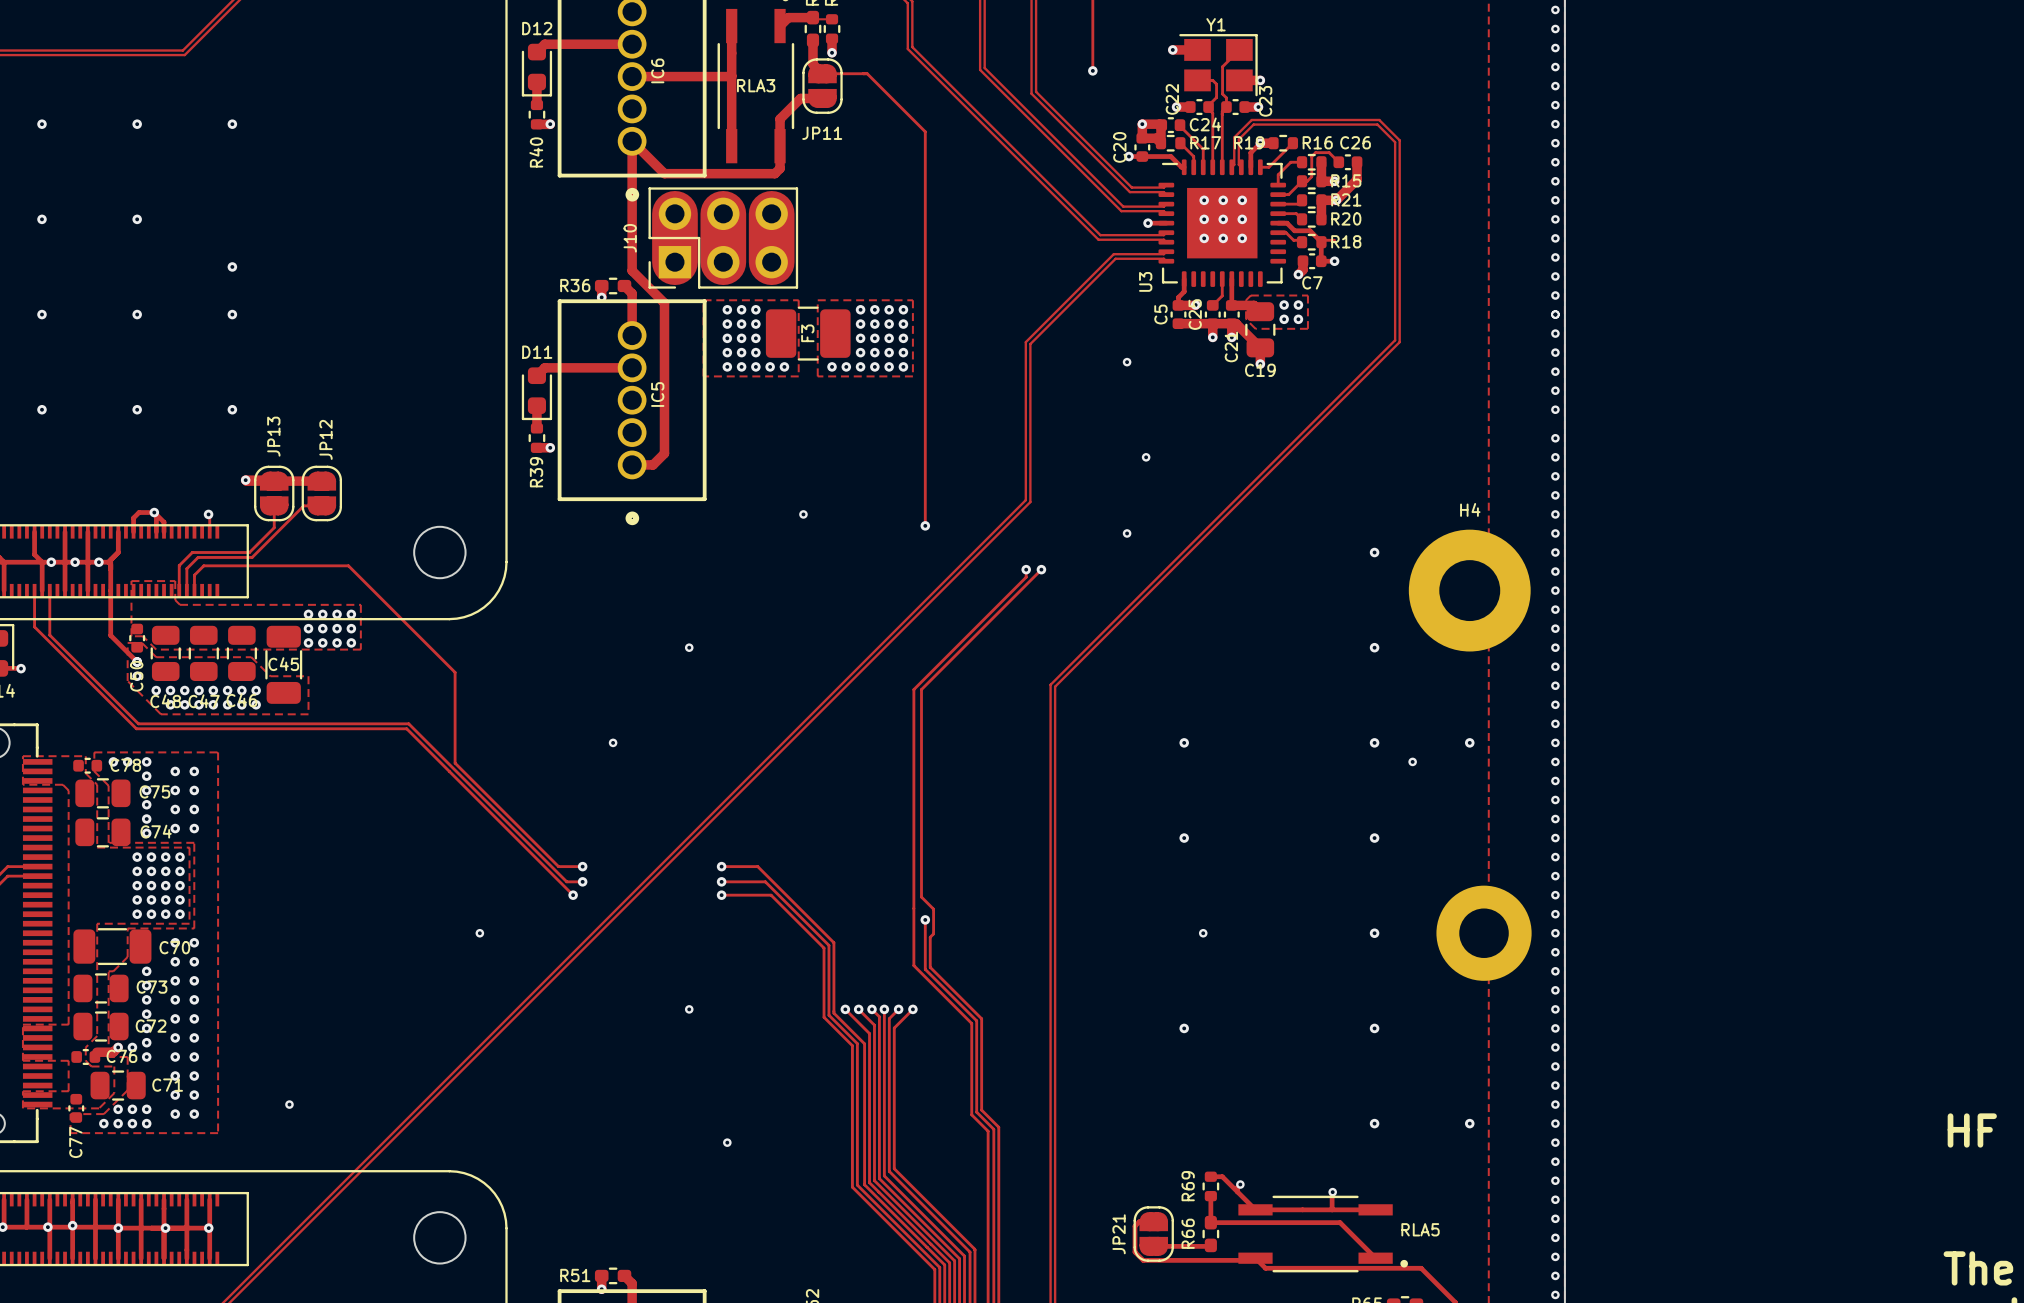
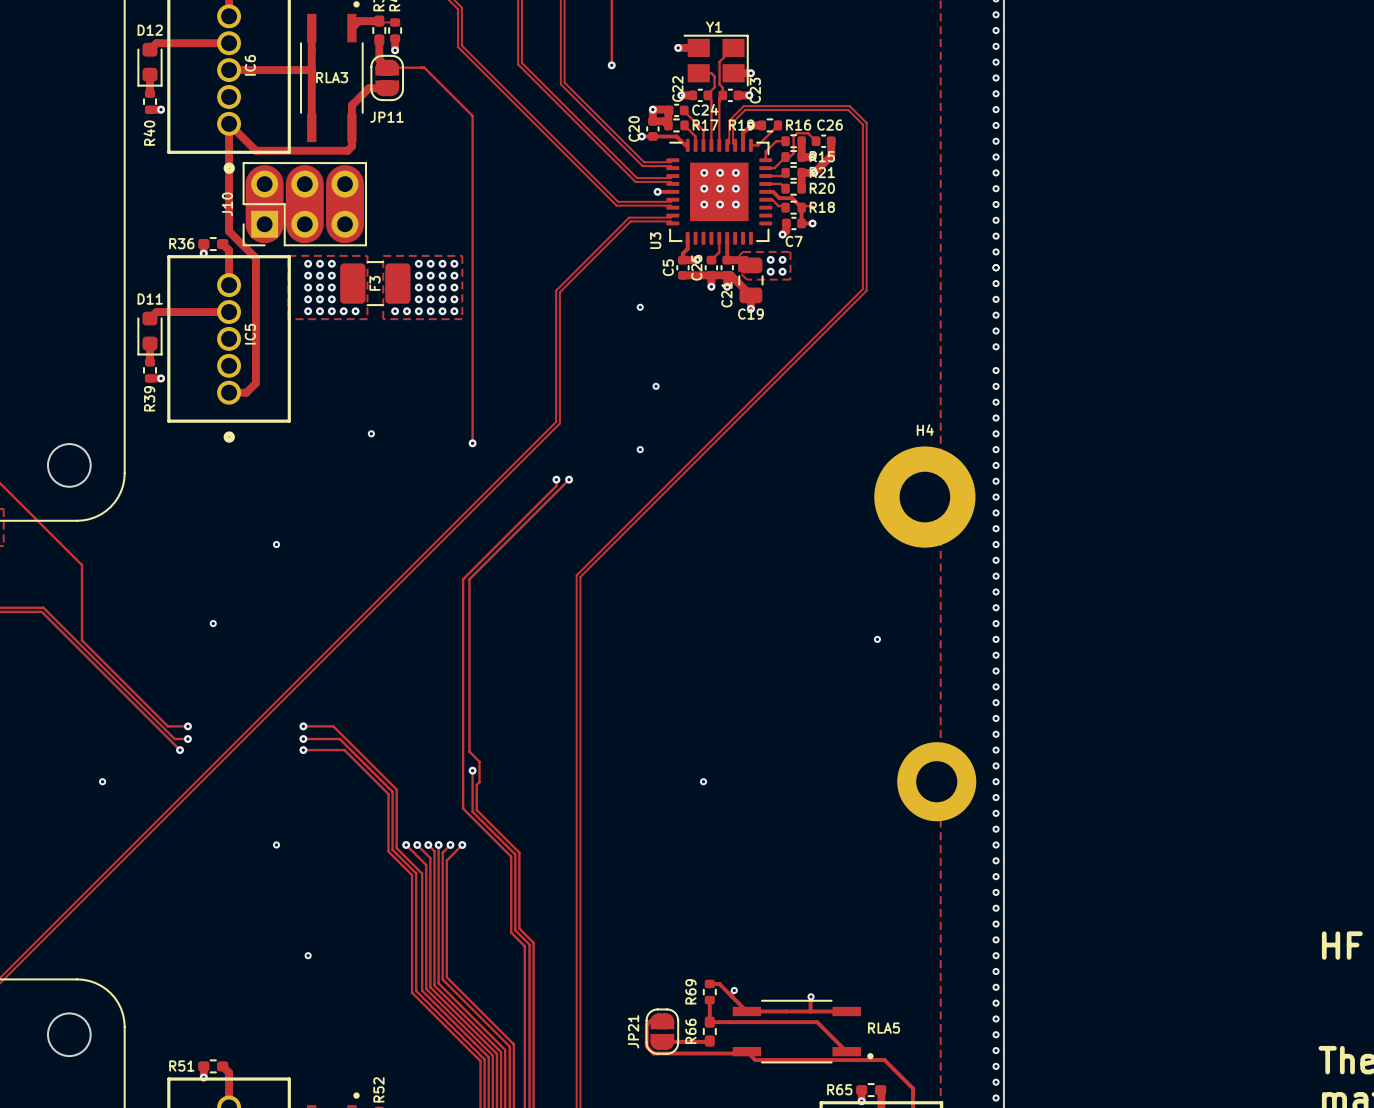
via: (1374, 552) -> none
via: (1374, 647) -> none
via: (1184, 742) -> none
via: (1374, 742) -> none
via: (1469, 742) -> none
via: (1184, 838) -> none
via: (1374, 838) -> none
via: (1374, 933) -> none
via: (1184, 1028) -> none
via: (1374, 1028) -> none
via: (1374, 1123) -> none
via: (1469, 1123) -> none

